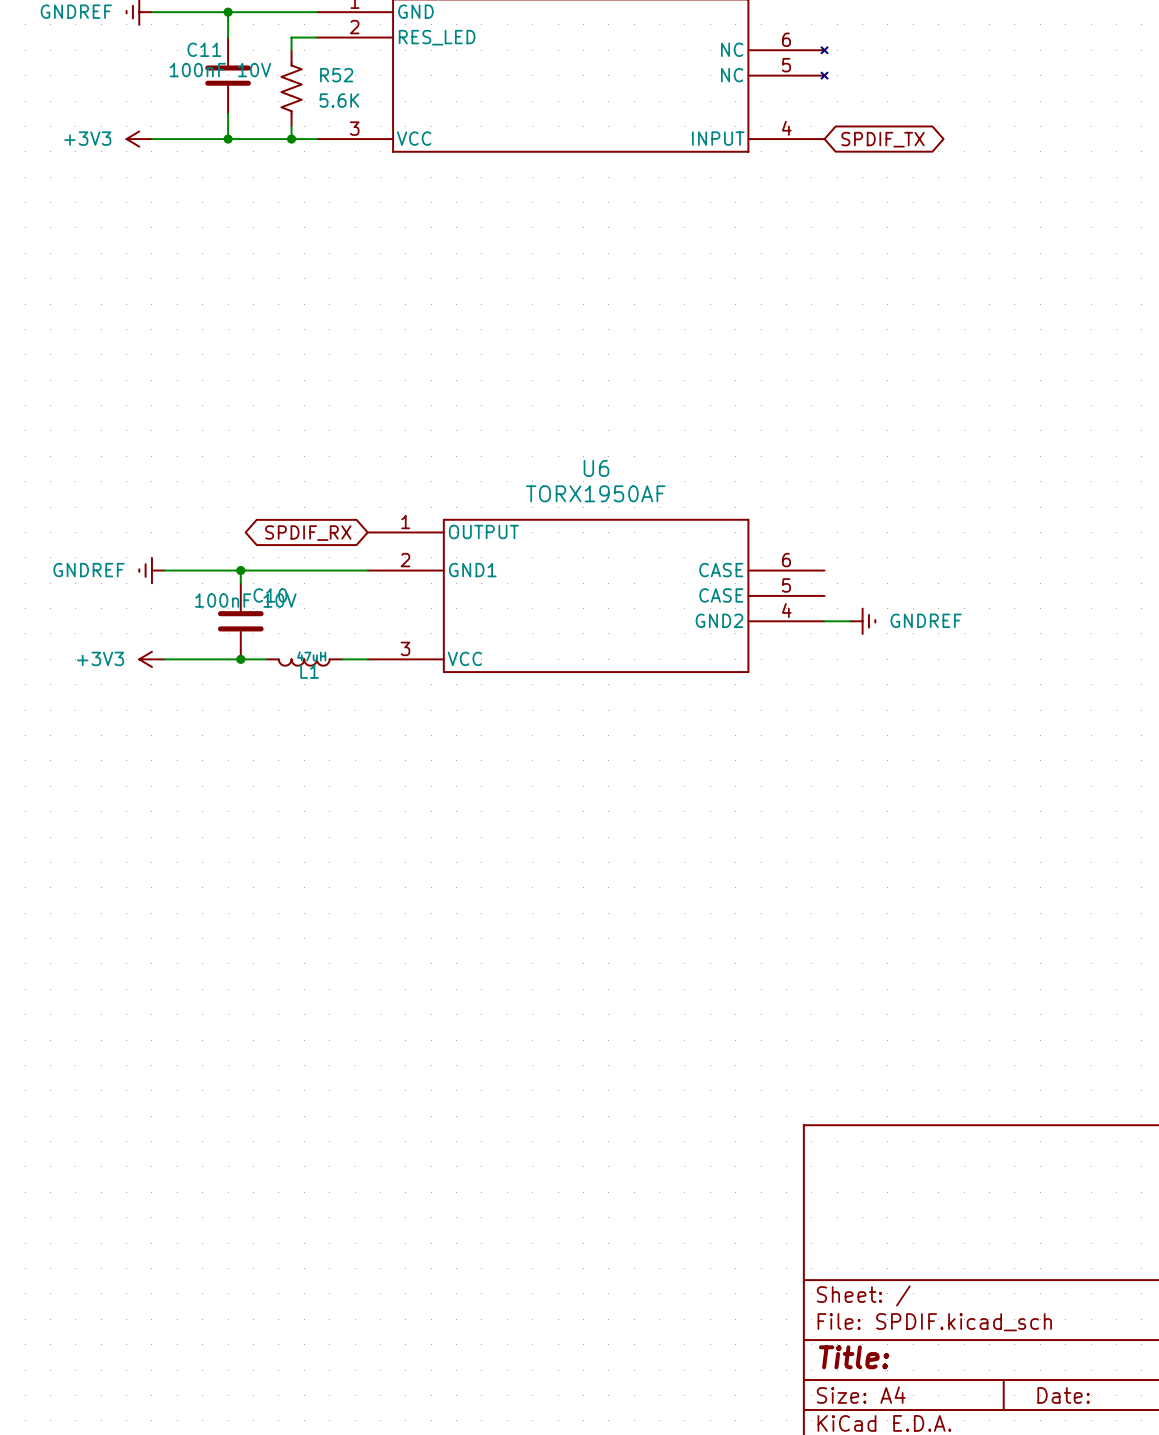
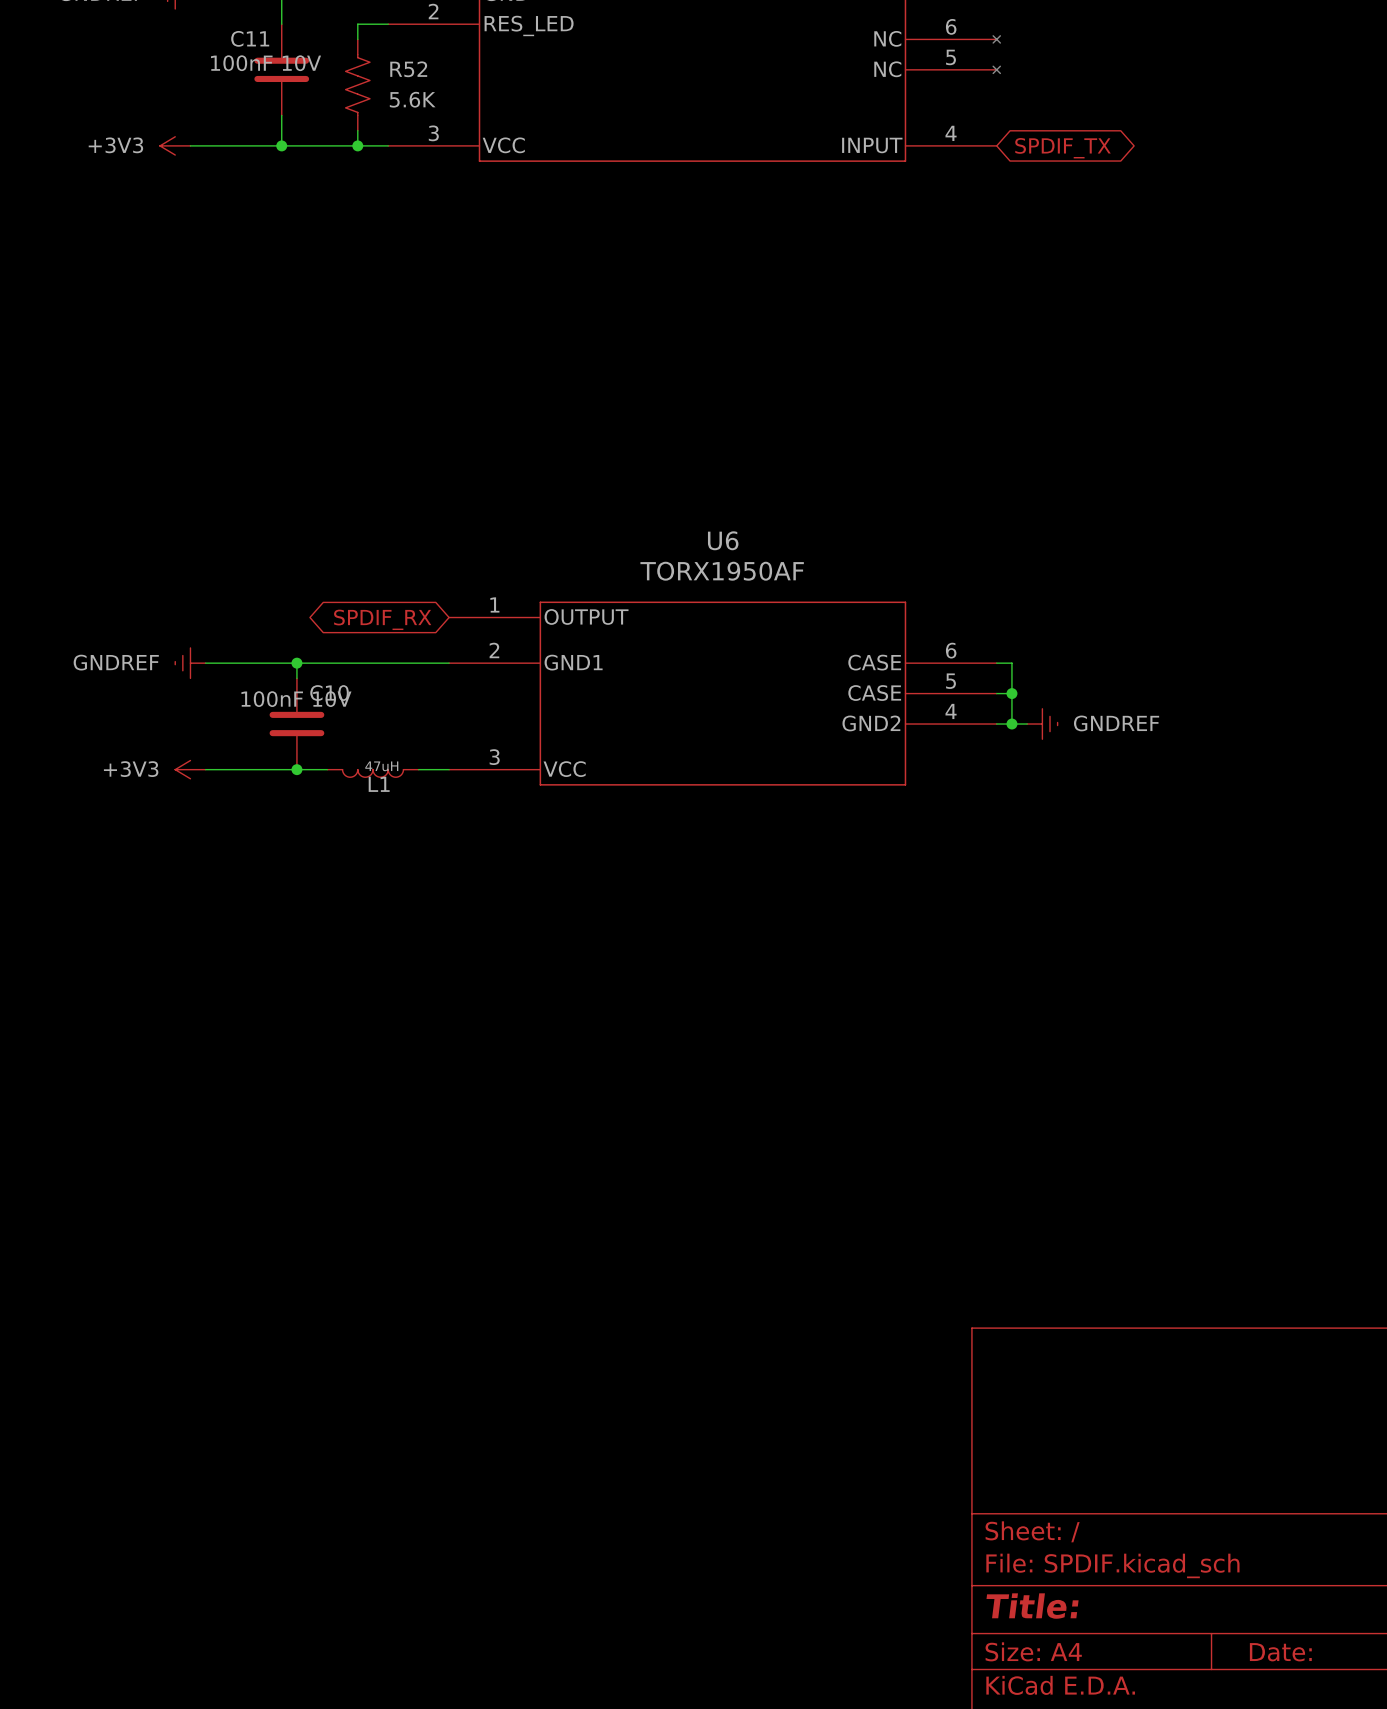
wire: none -> (996, 663) (1011, 663) (1011, 724)
wire: none -> (996, 693) (1011, 693)
junction: none -> (1011, 693)
junction: none -> (1011, 724)

